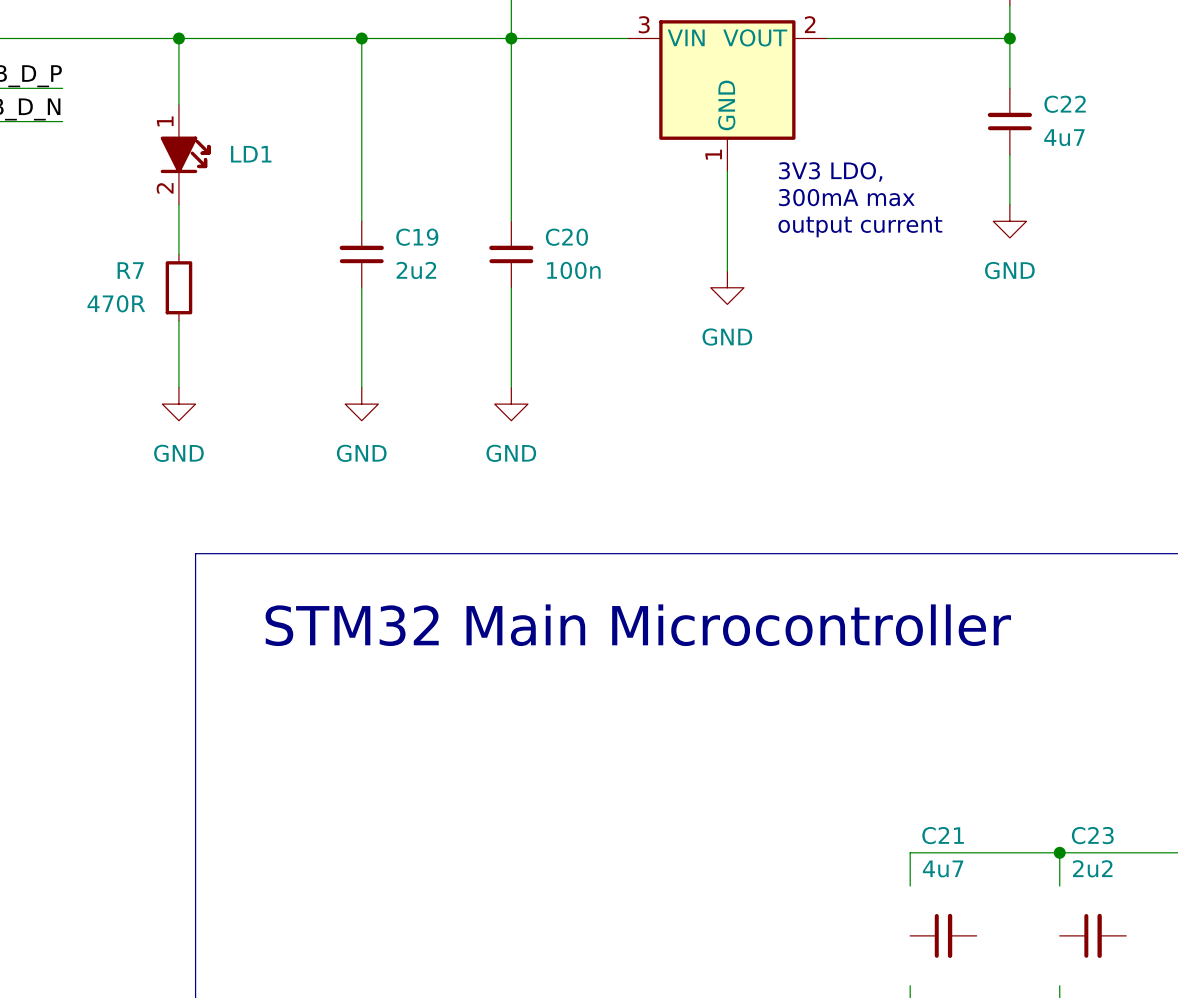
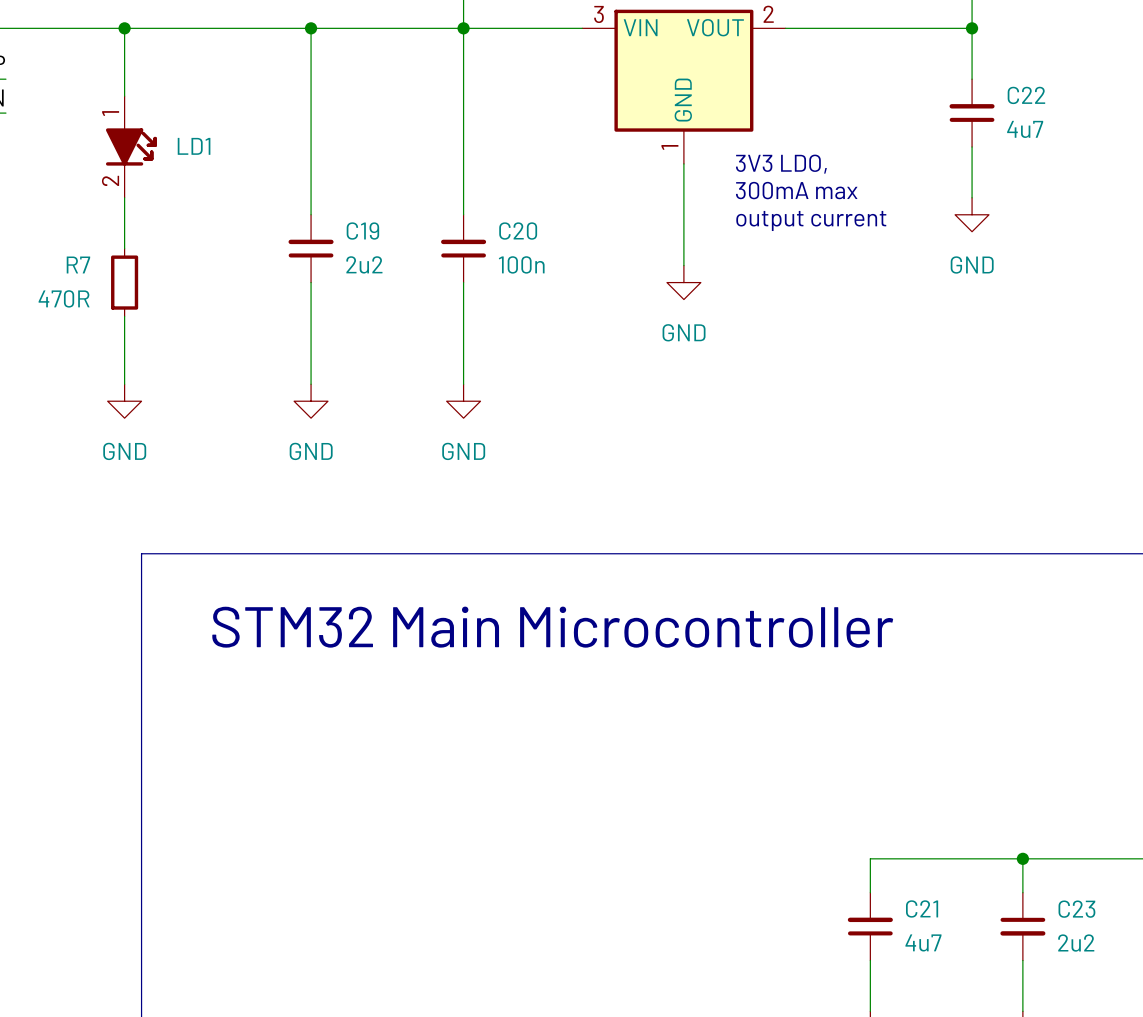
C21 name position: C21 (943, 835) -> C21 (922, 908)
C23 name position: C23 (1092, 835) -> C23 (1076, 909)
C21 text position: 4u7 (943, 868) -> 4u7 (923, 942)
C21 rotation: 0° (943, 935) -> 90° counterclockwise (870, 926)
C23 rotation: 0° (1093, 935) -> 90° clockwise (1022, 926)
wire: none -> (870, 960) (870, 994)
wire: none -> (1022, 960) (1022, 994)

